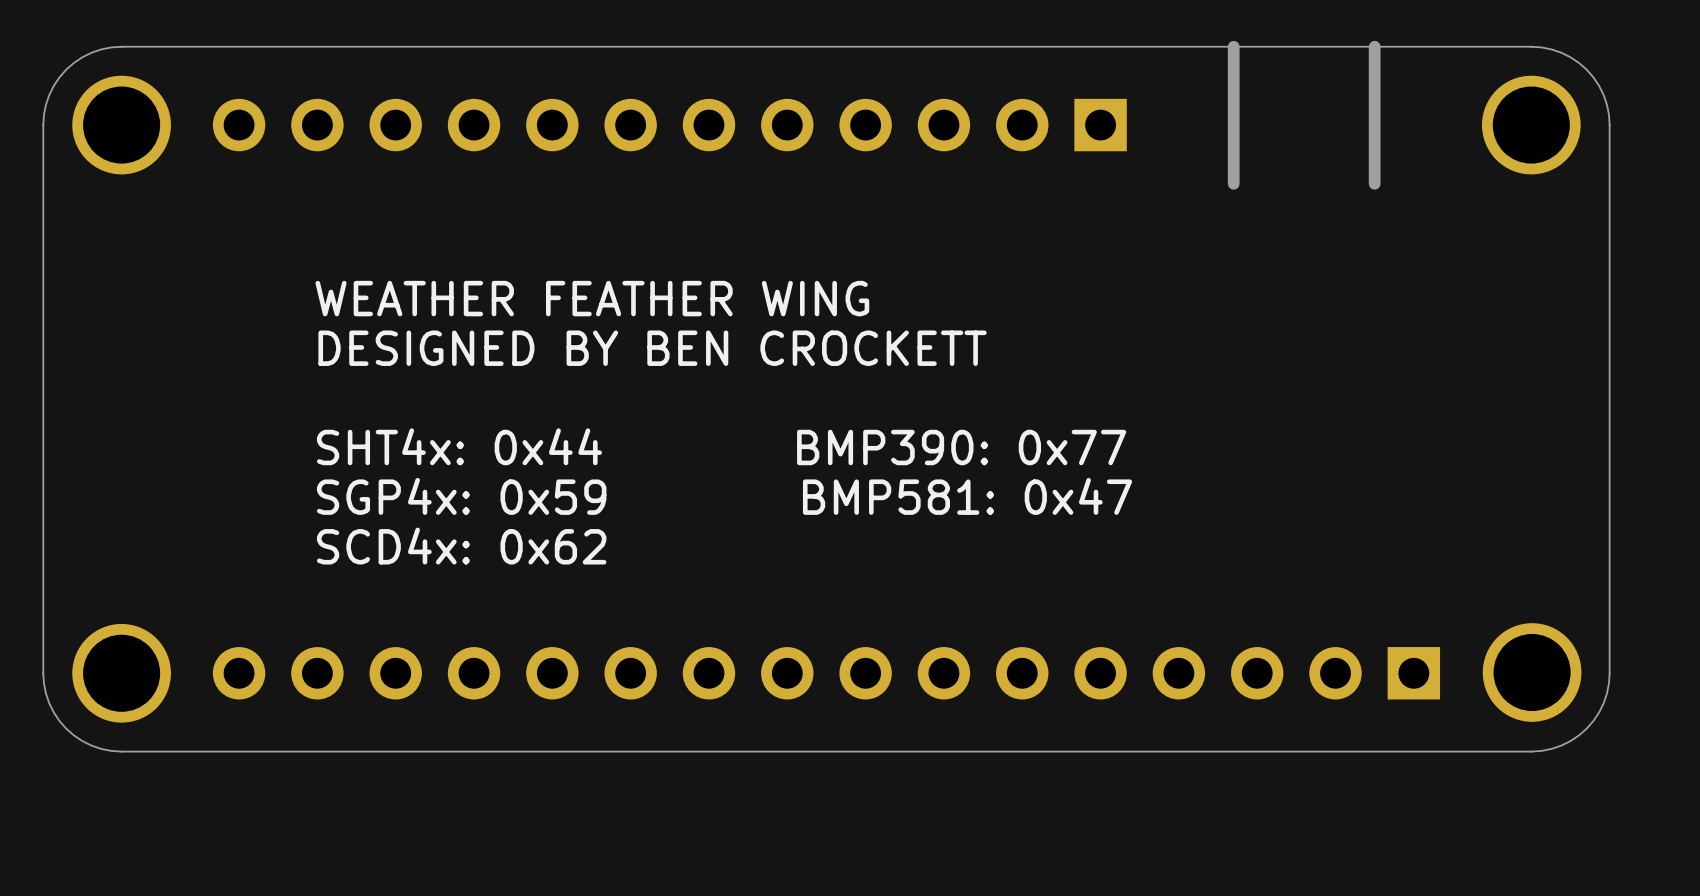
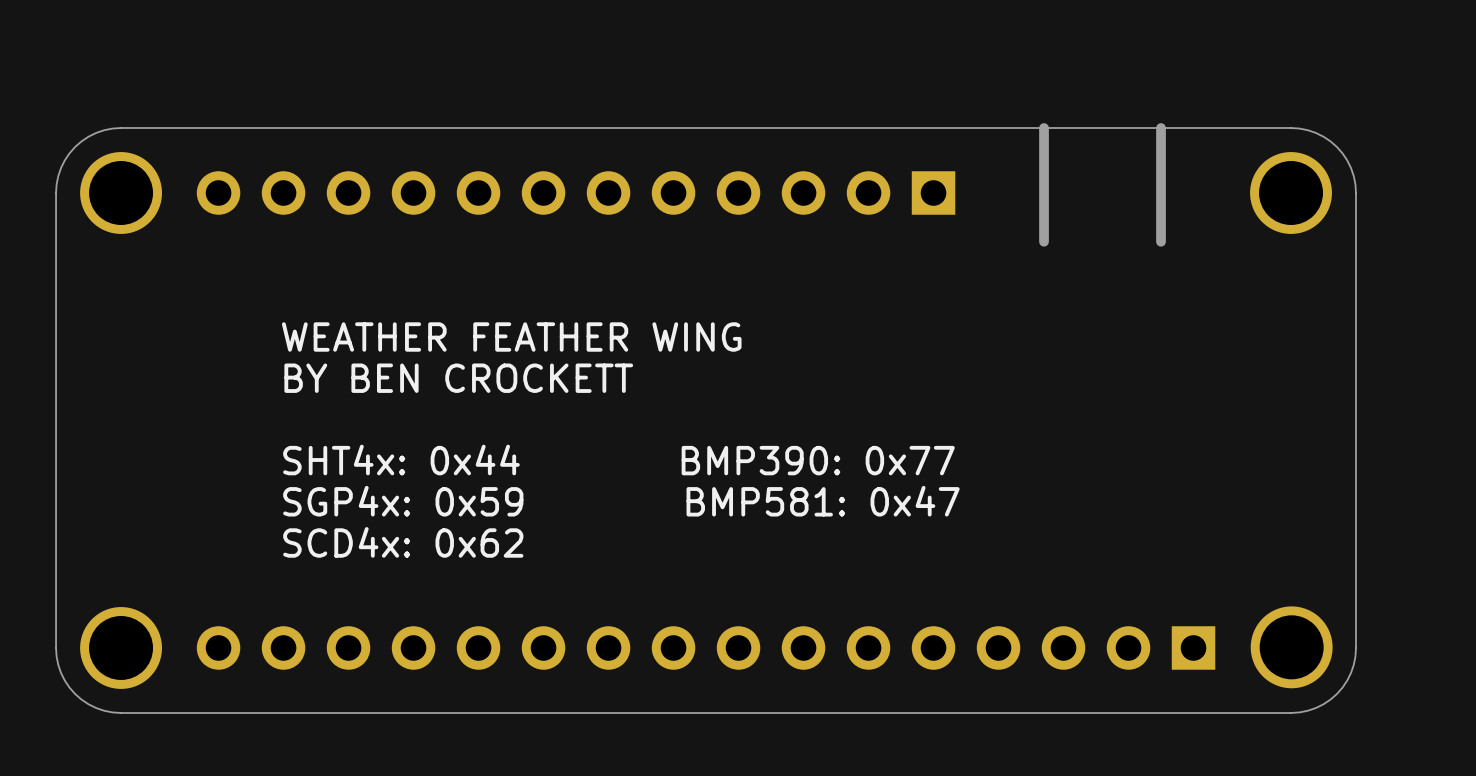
text: DESIGNED BY BEN CROCKETT (652, 348) -> BY BEN CROCKETT (458, 378)

